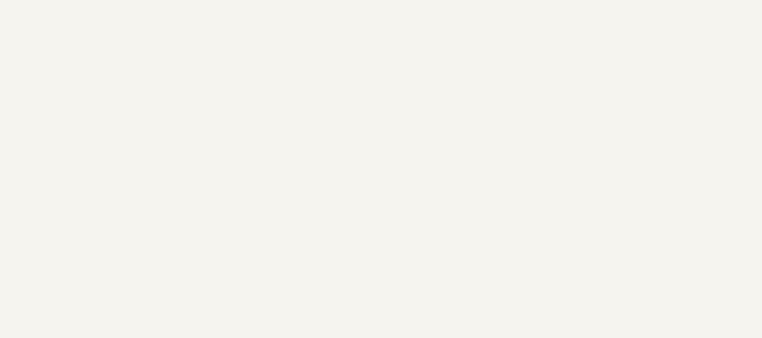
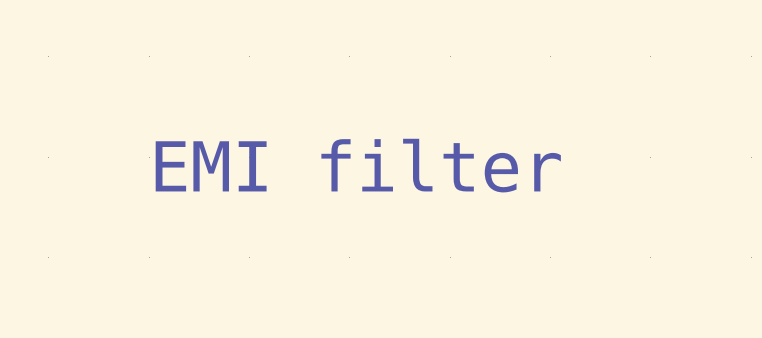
text: none -> EMI filter (358, 165)

